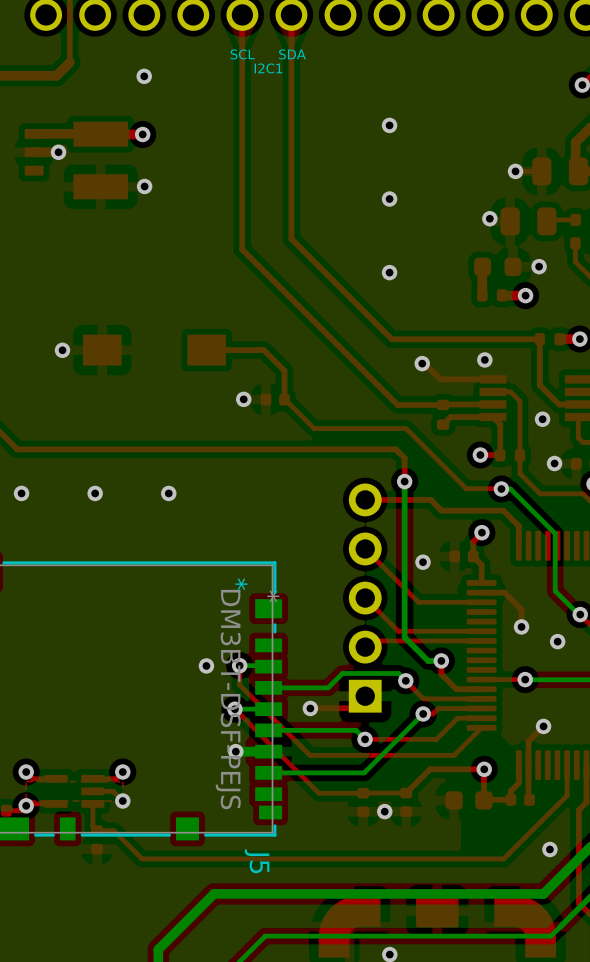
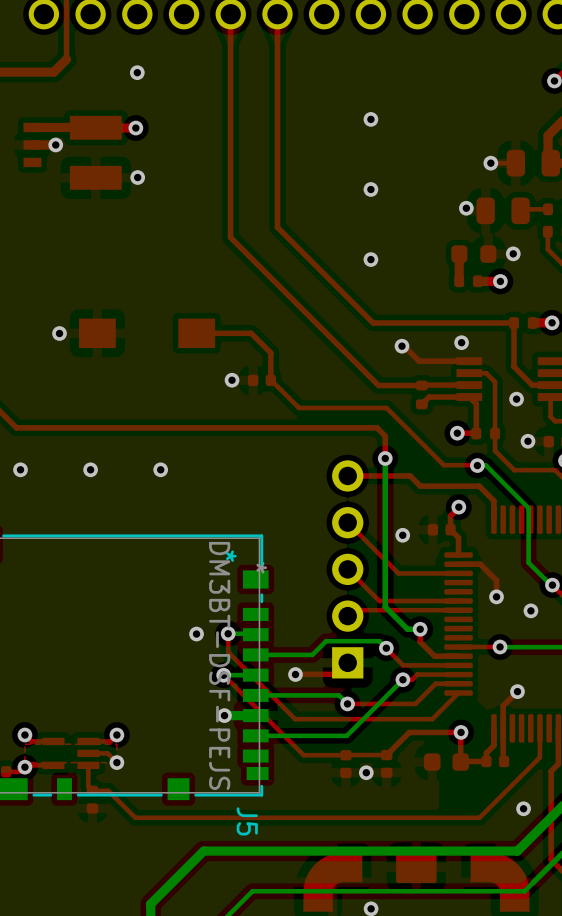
text: SCL (242, 54) -> none
text: SDA (292, 54) -> none
text: I2C1 (268, 68) -> none

